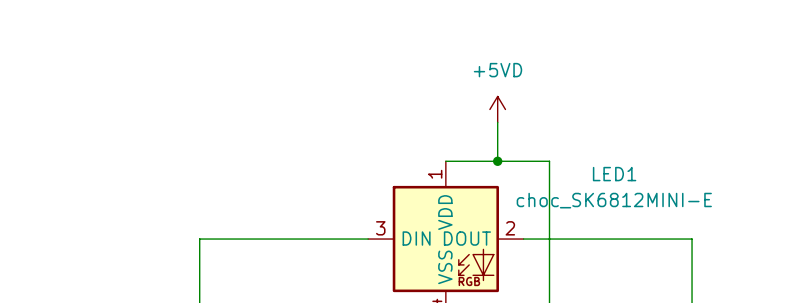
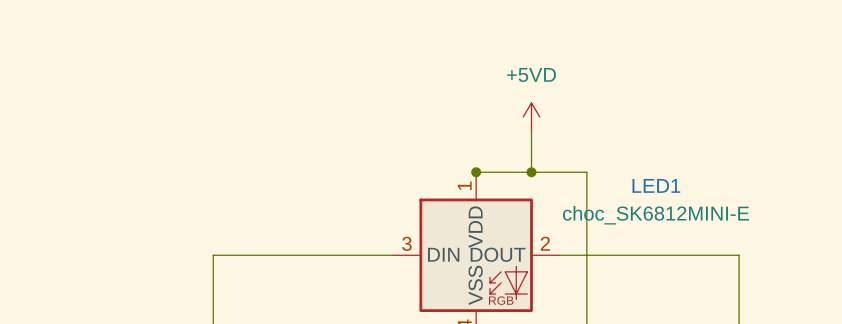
junction: none -> (476, 172)

